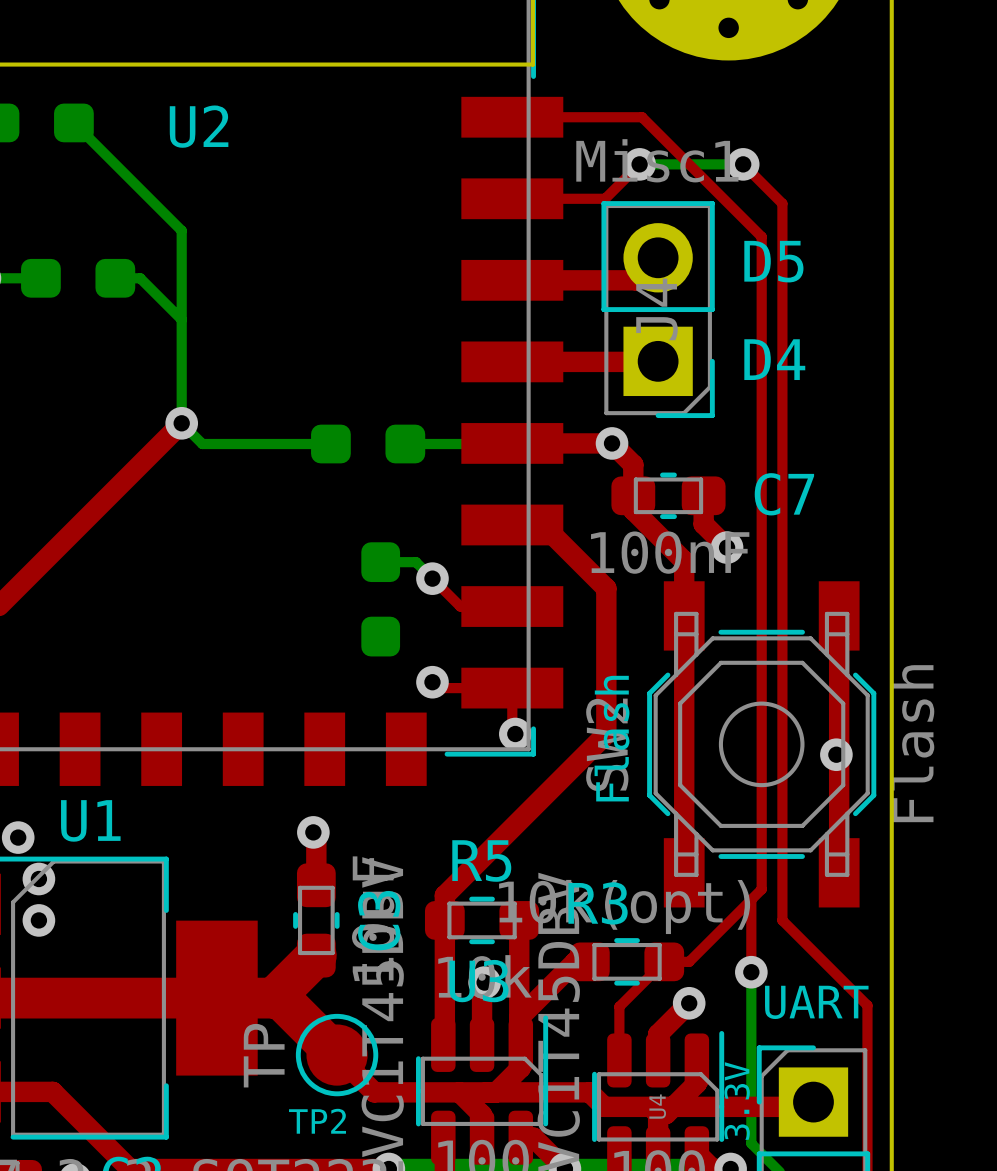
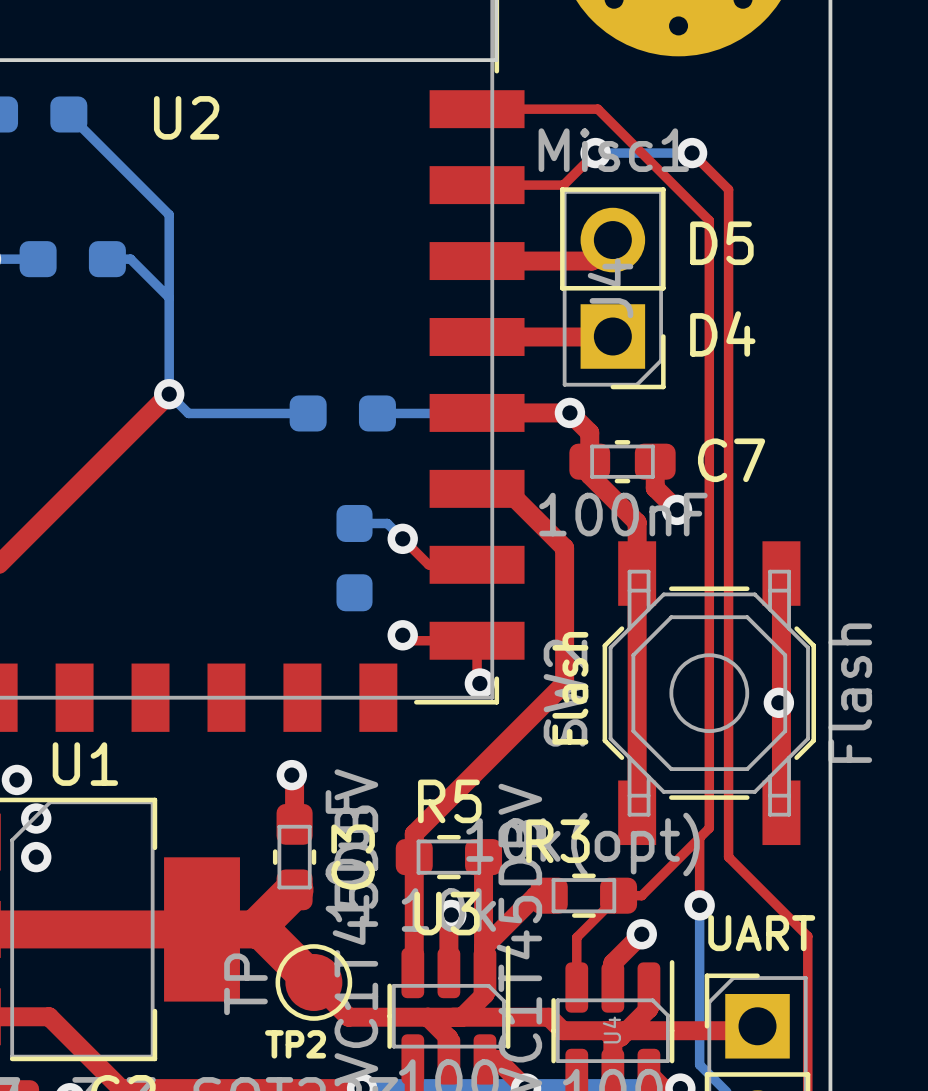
text: 3.3V (737, 1101) -> none

